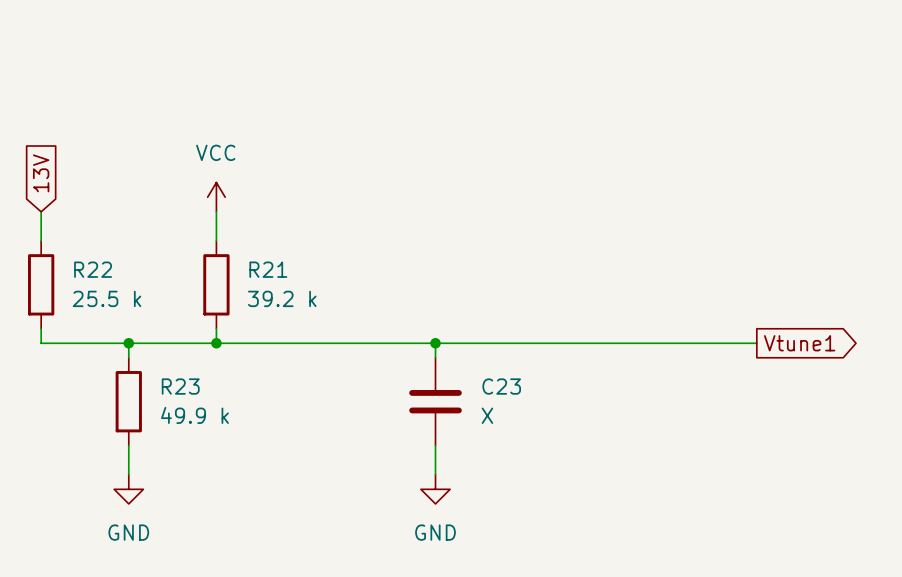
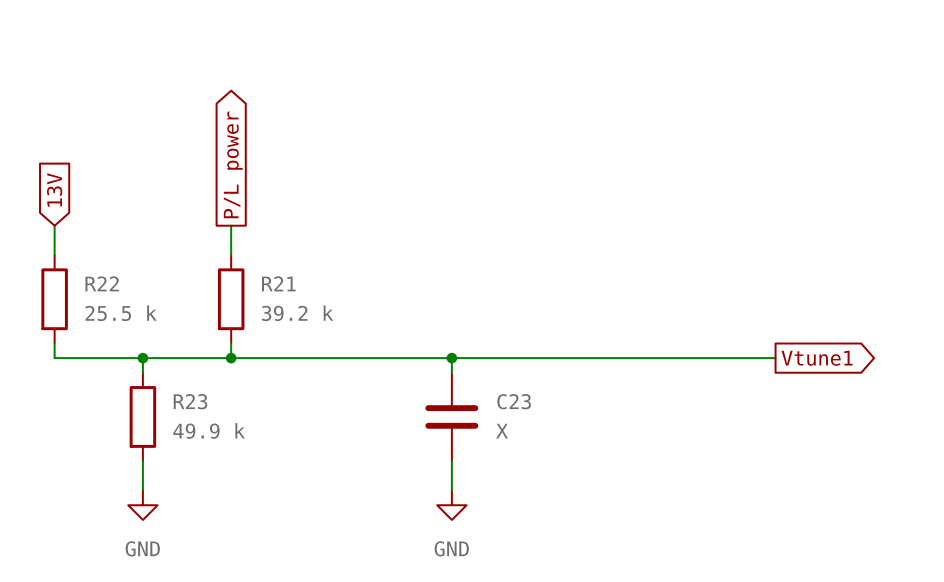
global label: none -> P/L power (233, 164)
power symbol: VCC (216, 197) -> none

